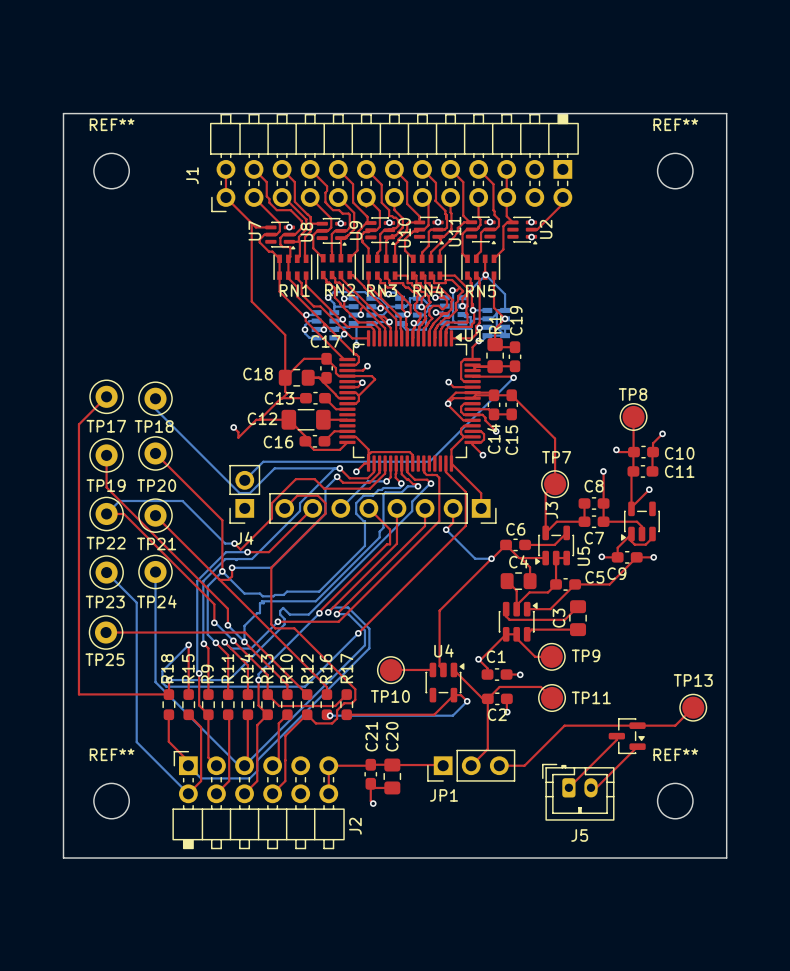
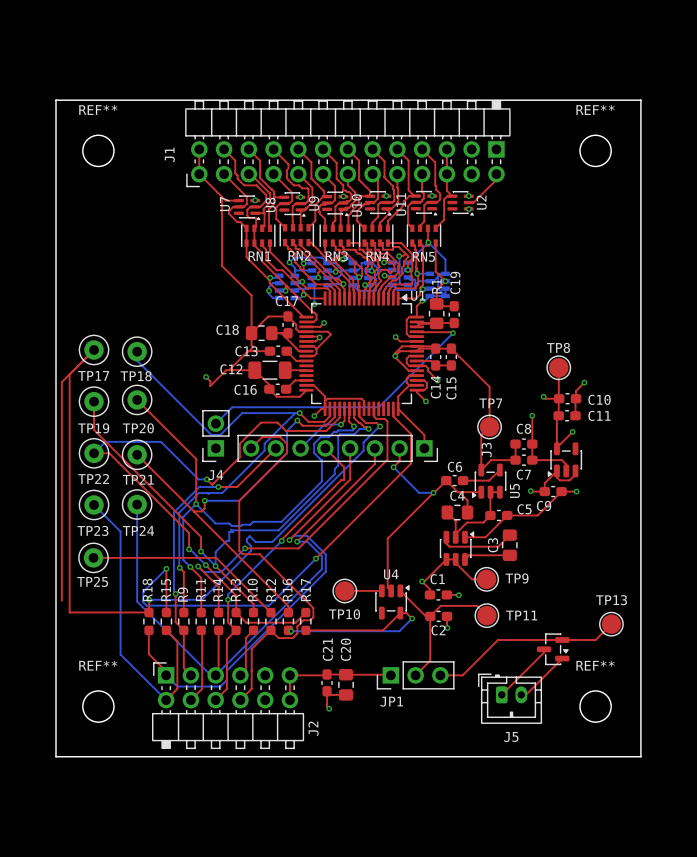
top track: none -> (69, 374) (61, 382) (61, 600)

